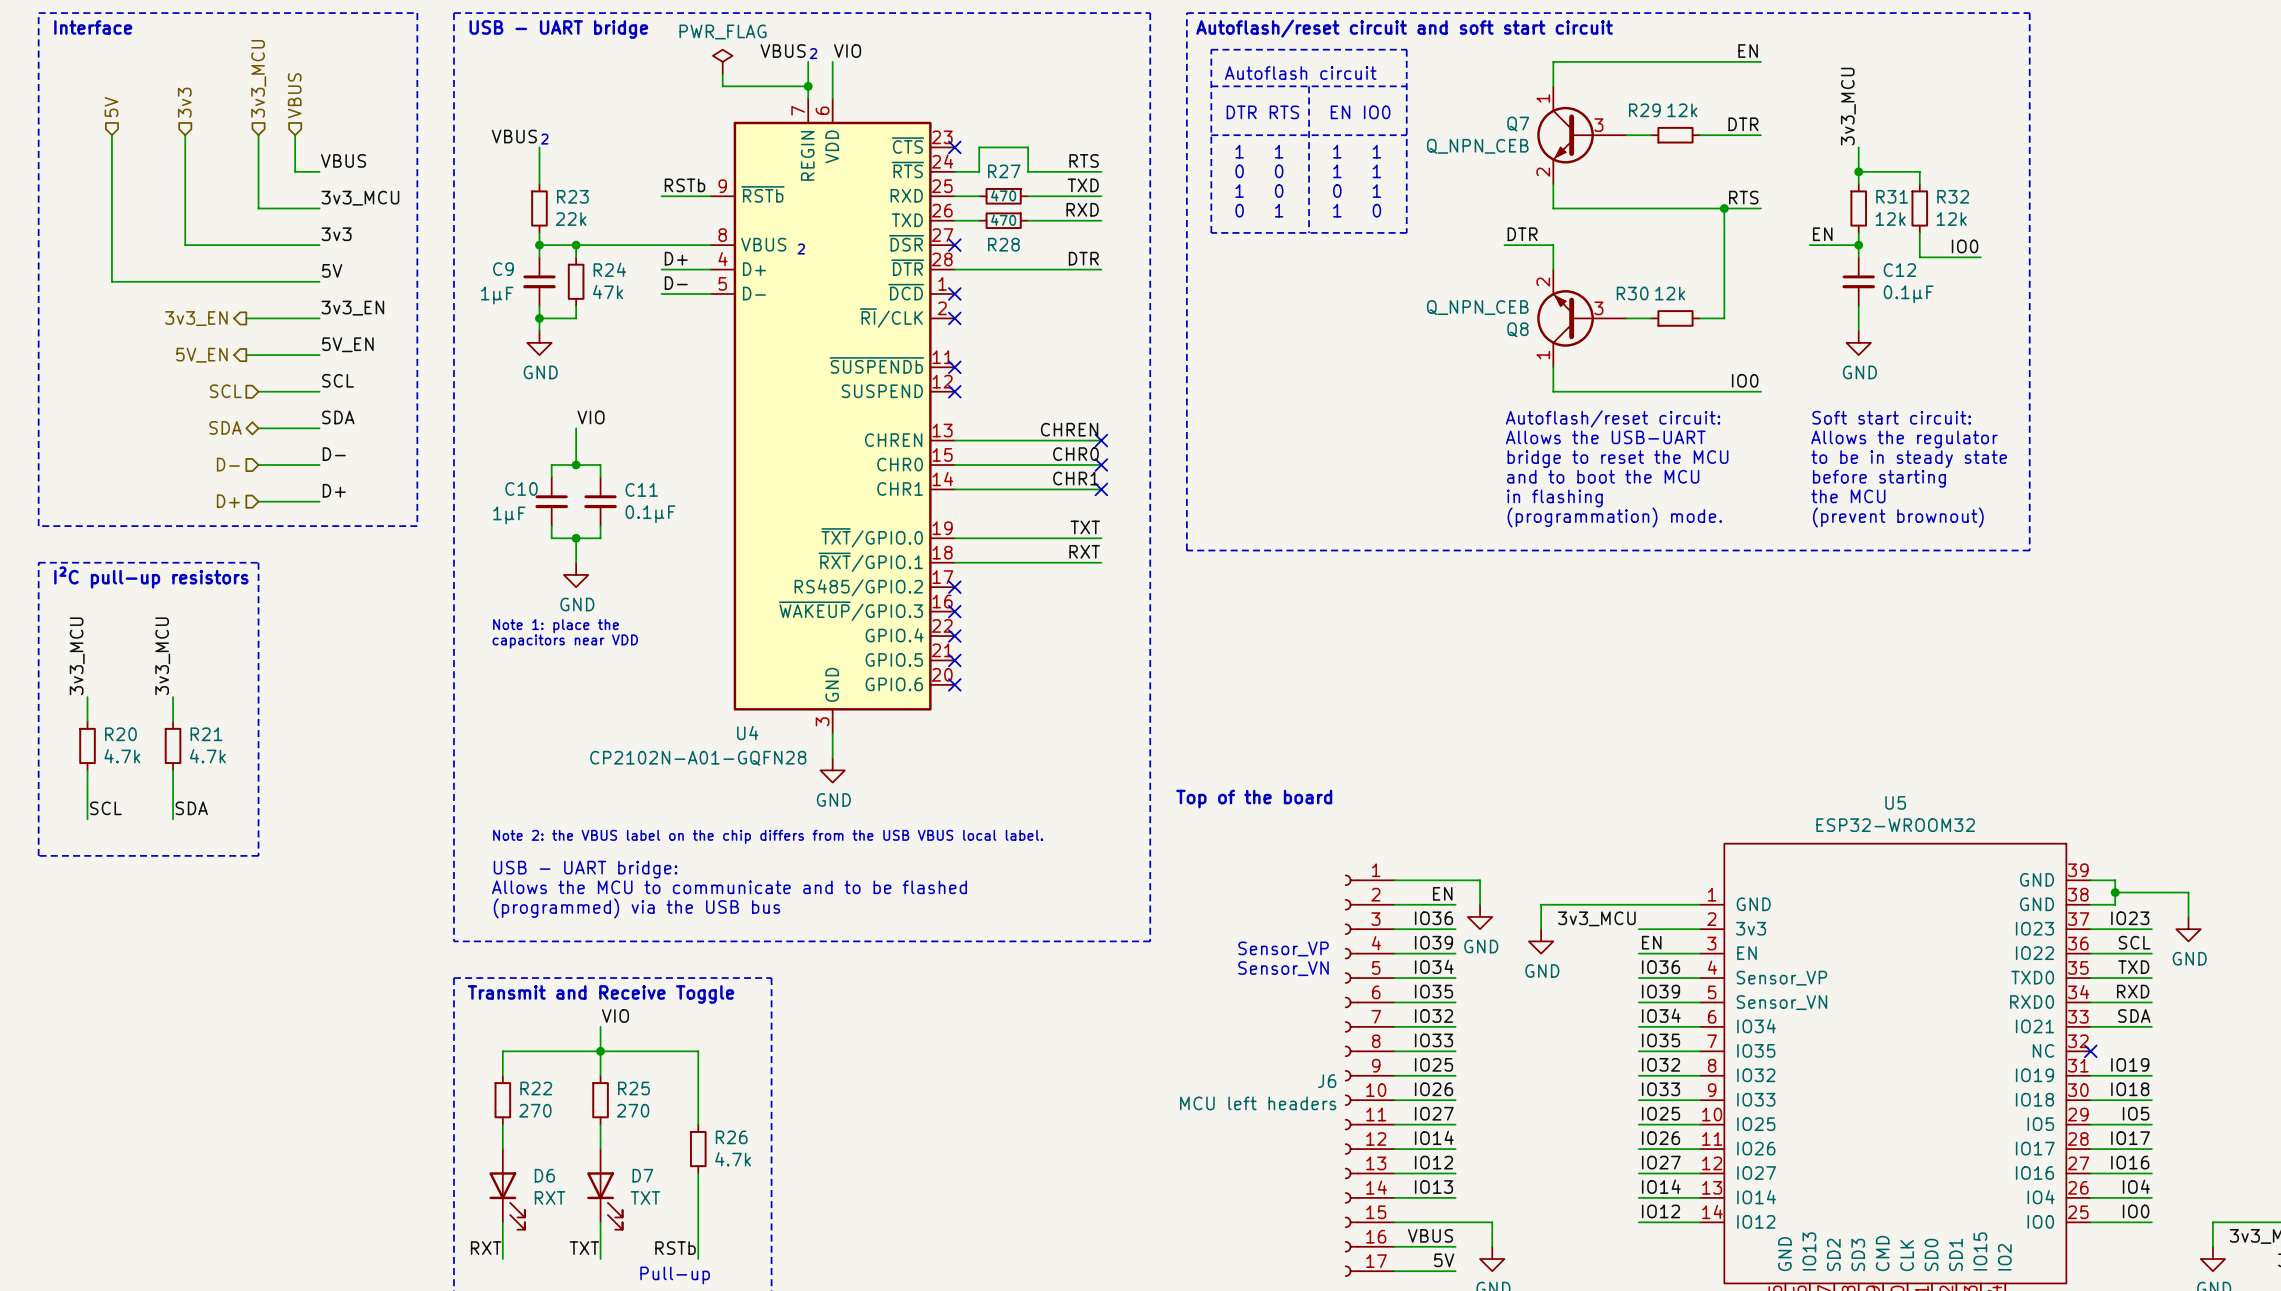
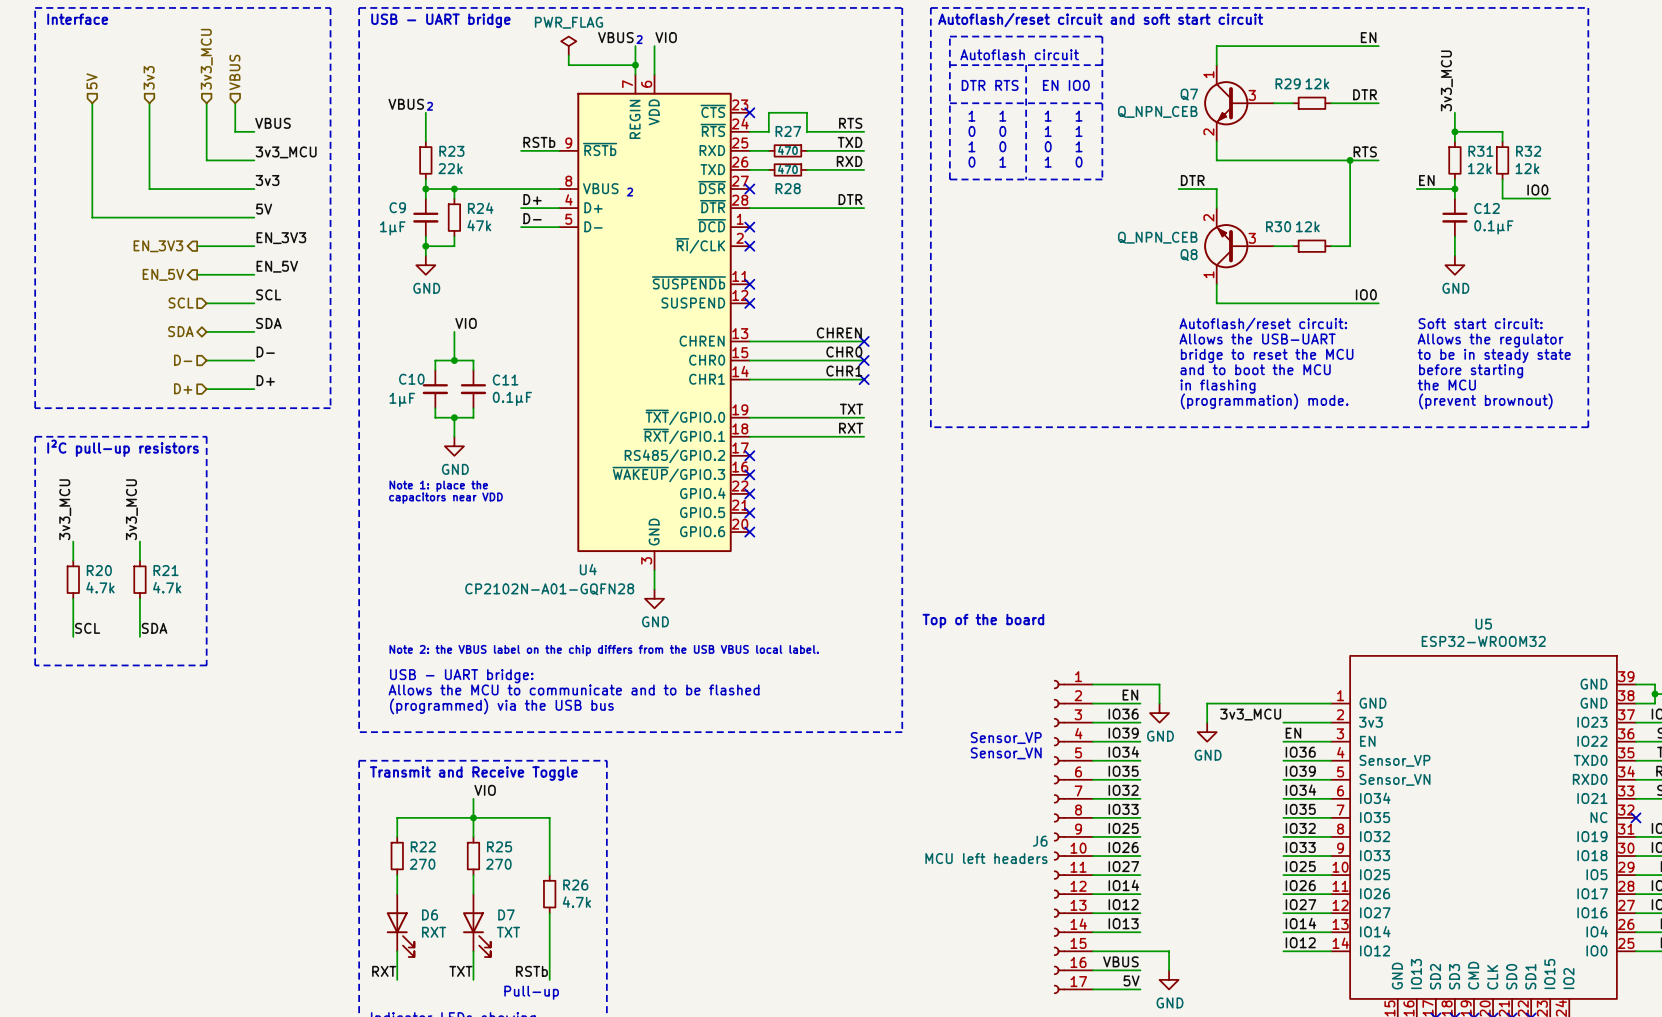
label: 3v3_EN (352, 308) -> EN_3V3 (281, 238)
hierarchical label: 3v3_EN (196, 318) -> EN_3V3 (158, 246)
label: 5V_EN (347, 344) -> EN_5V (277, 266)
hierarchical label: 5V_EN (201, 355) -> EN_5V (163, 274)

